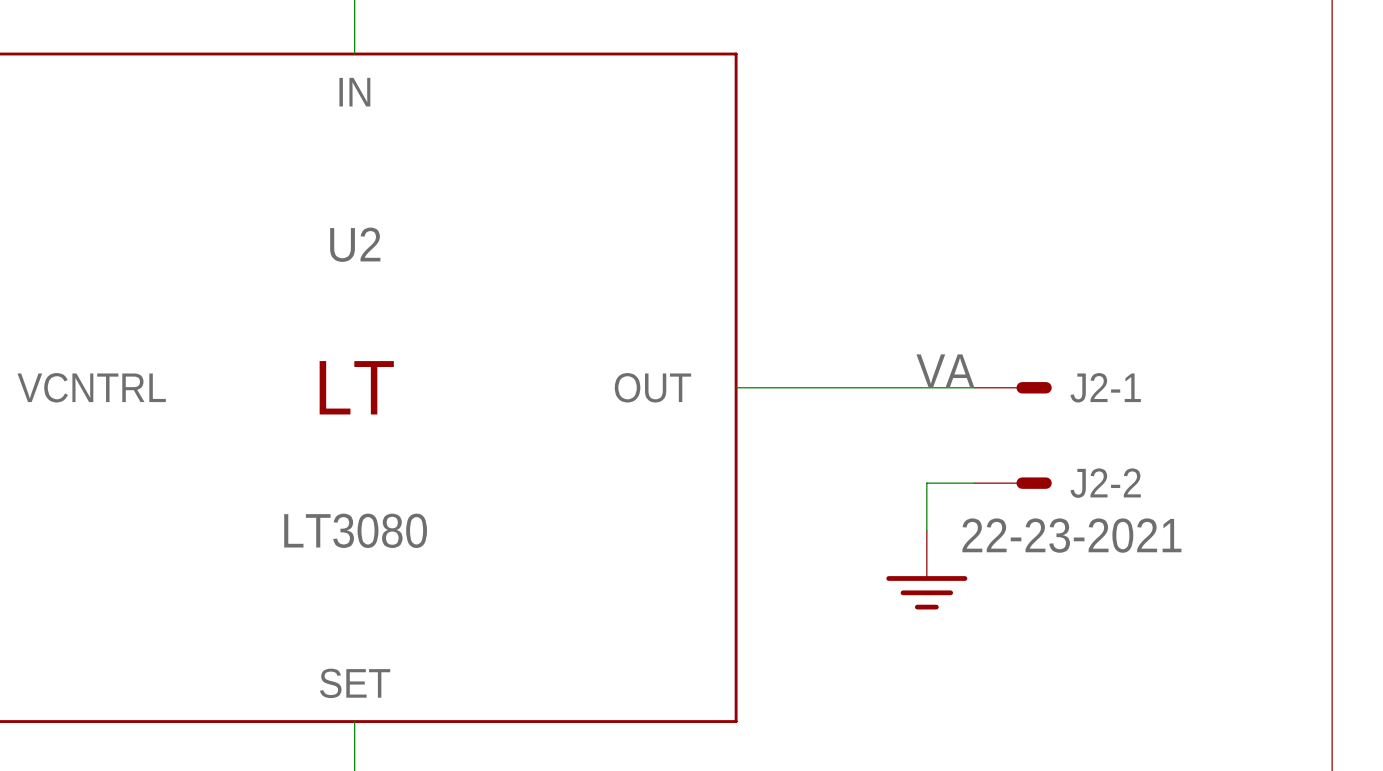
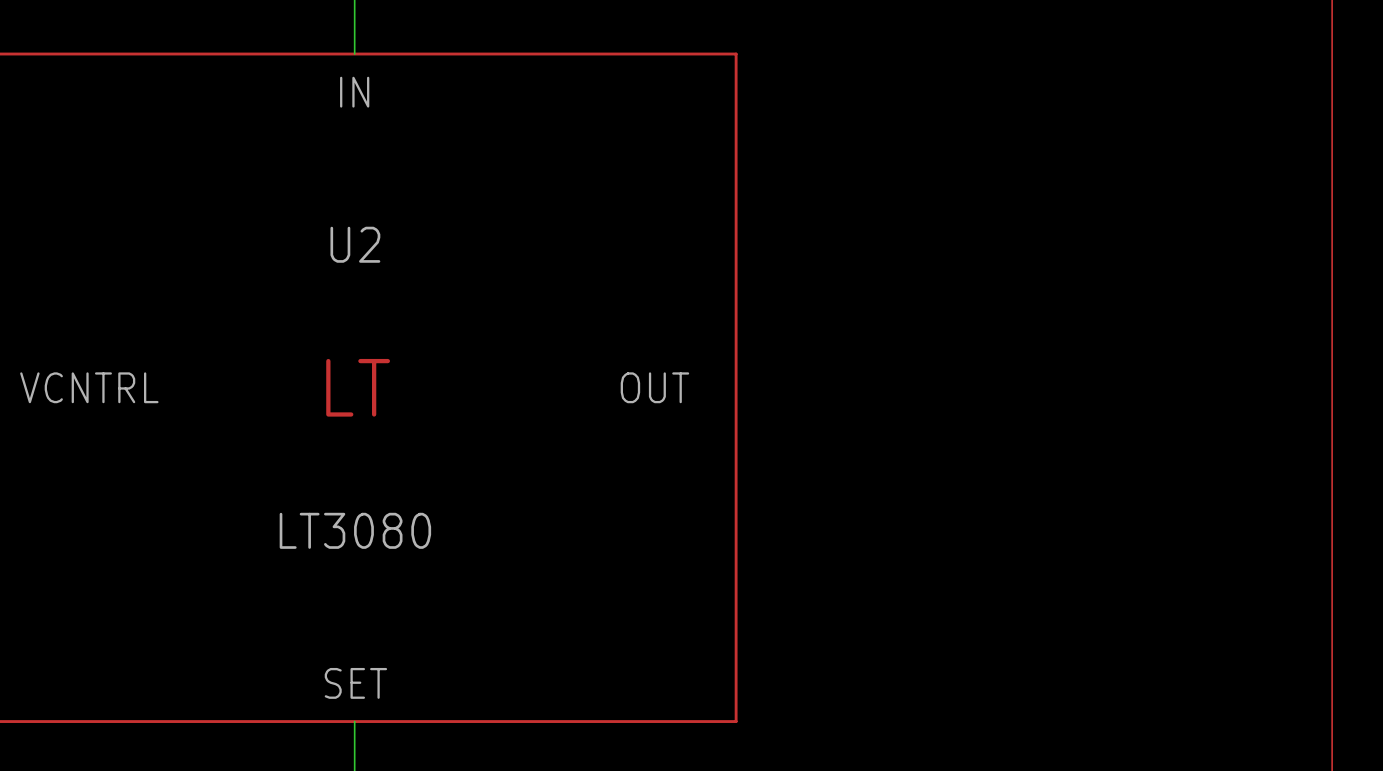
label: VA (945, 371) -> none
wire: (736, 387) (974, 387) -> none
J2-1: 22-23-2021 (1013, 387) -> none
wire: (974, 483) (926, 483) (926, 530) -> none
J2-2: (1013, 483) -> none
power symbol: (926, 570) -> none

